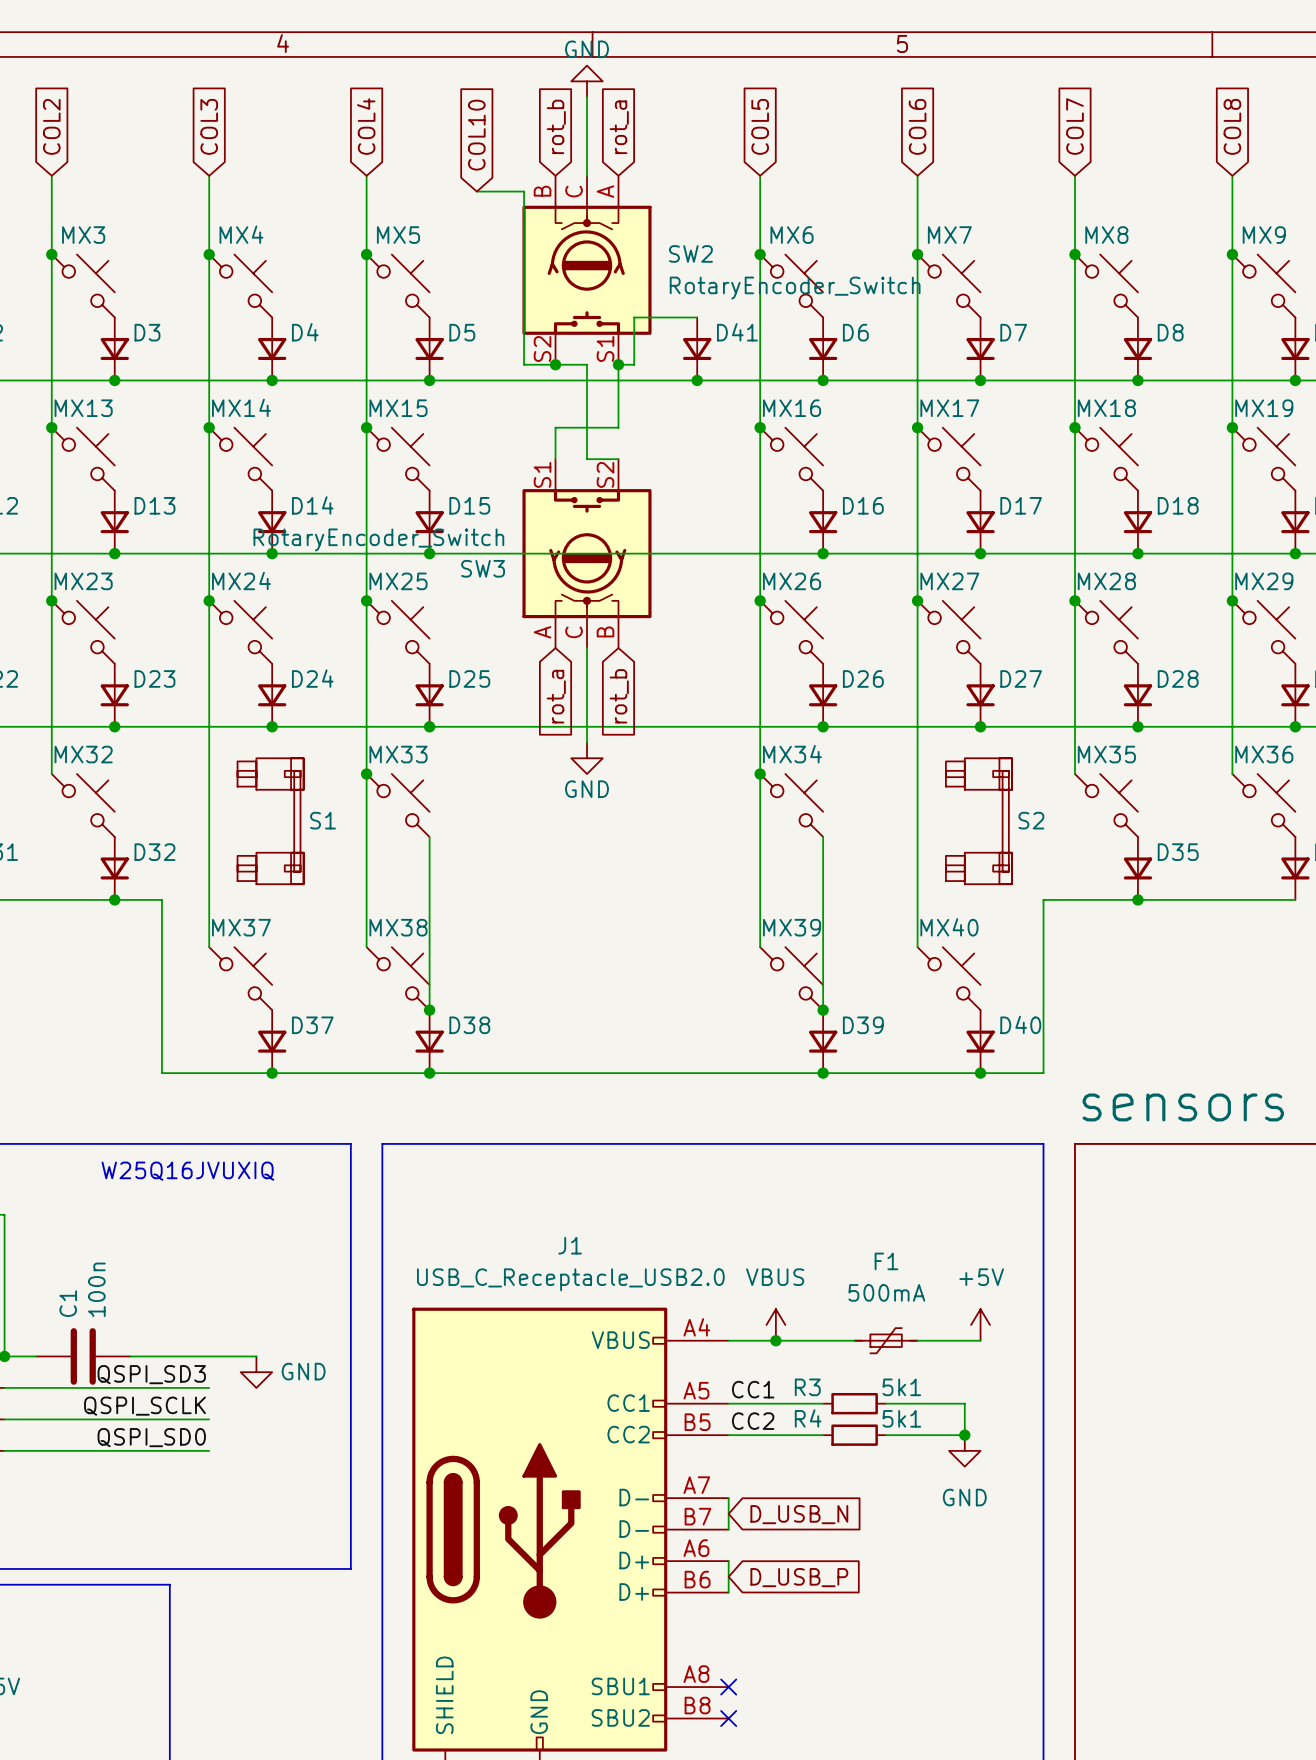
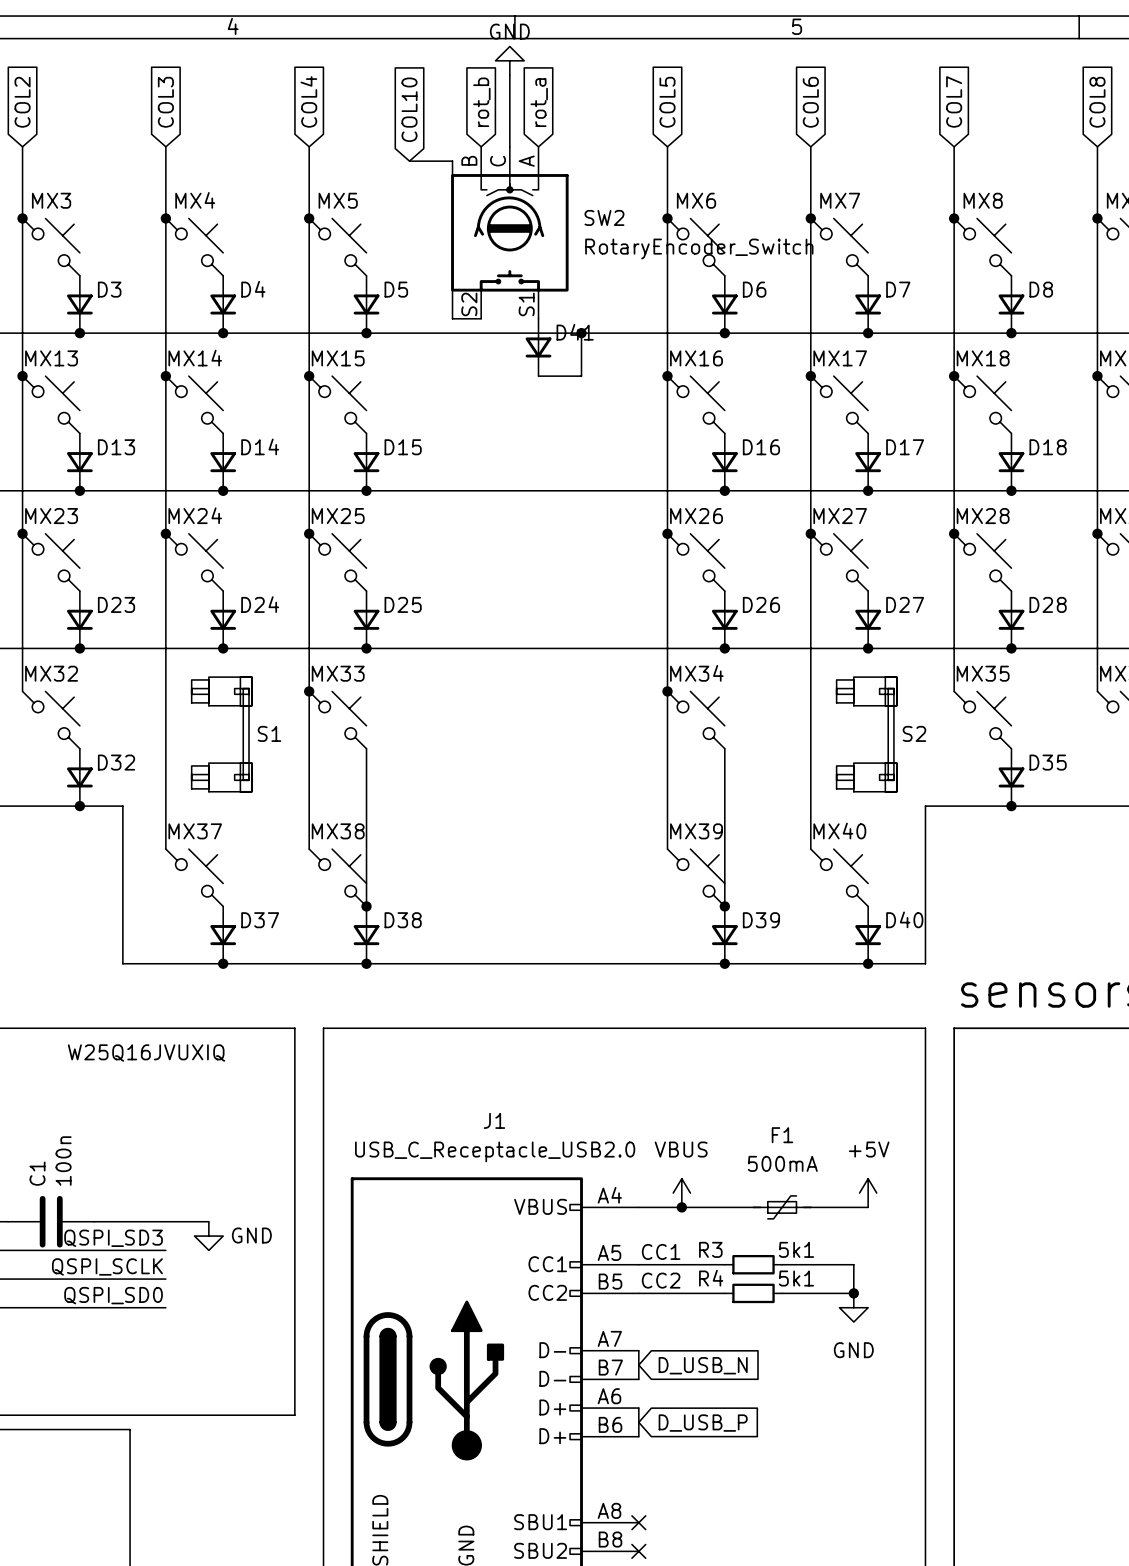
wire: (697, 317) (634, 317) (634, 364) (618, 364) (618, 427) (555, 427) (555, 459) -> none
D41 position: (697, 348) -> (538, 347)
wire: (555, 364) (587, 364) (587, 459) (618, 459) -> none
junction: (555, 364) -> none
junction: (618, 364) -> none
wire: none -> (581, 333) (581, 376) (538, 376)
junction: none -> (581, 333)
junction: (697, 380) -> none
SW3: RotaryEncoder_Switch (587, 553) -> none
wire: (587, 648) (587, 742) -> none
global label: rot_a (556, 696) -> none
global label: rot_b (619, 696) -> none
power symbol: GND (587, 758) -> none

